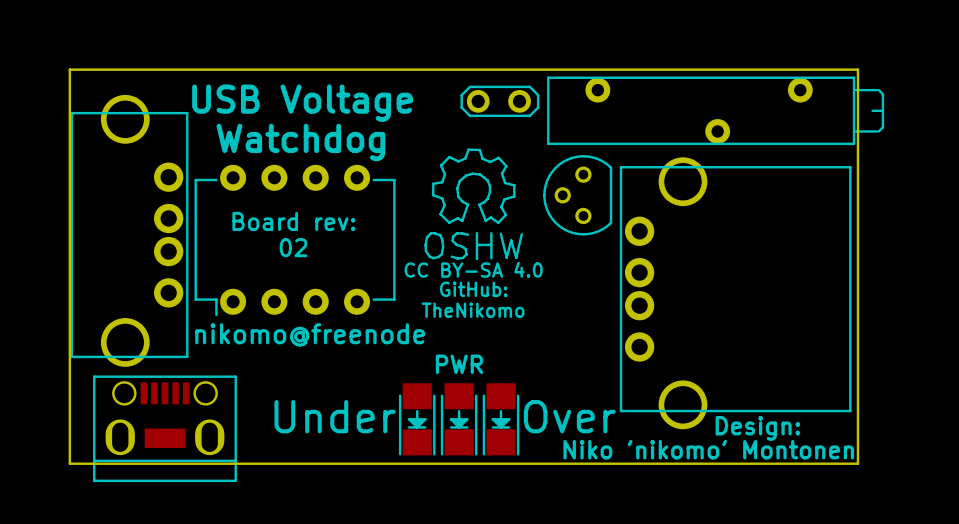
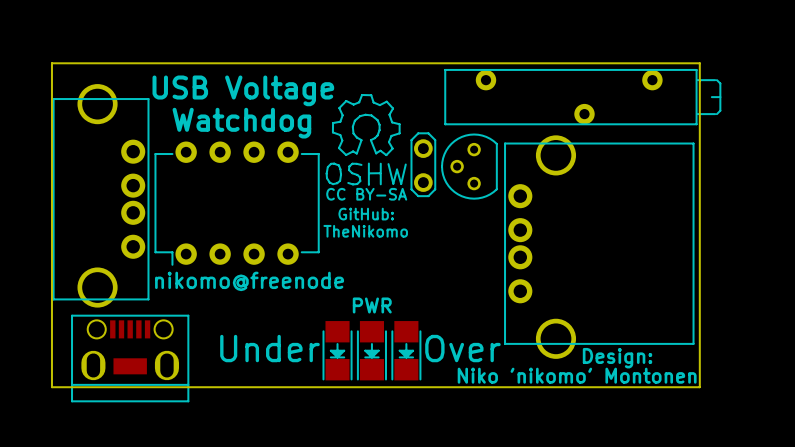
part rotation: 0° (499, 101) -> 90° counterclockwise (423, 164)
part position: (499, 101) -> (423, 164)
drawing position: (473, 204) -> (366, 139)
text: Board rev: (293, 221) -> none
text: none -> CC BY-SA (366, 194)
text: 02 (293, 247) -> none
text: CC BY-SA 4.0 (473, 269) -> none
text position: GitHub: (473, 289) -> GitHub: (366, 214)
text position: TheNikomo (473, 310) -> TheNikomo (365, 231)

